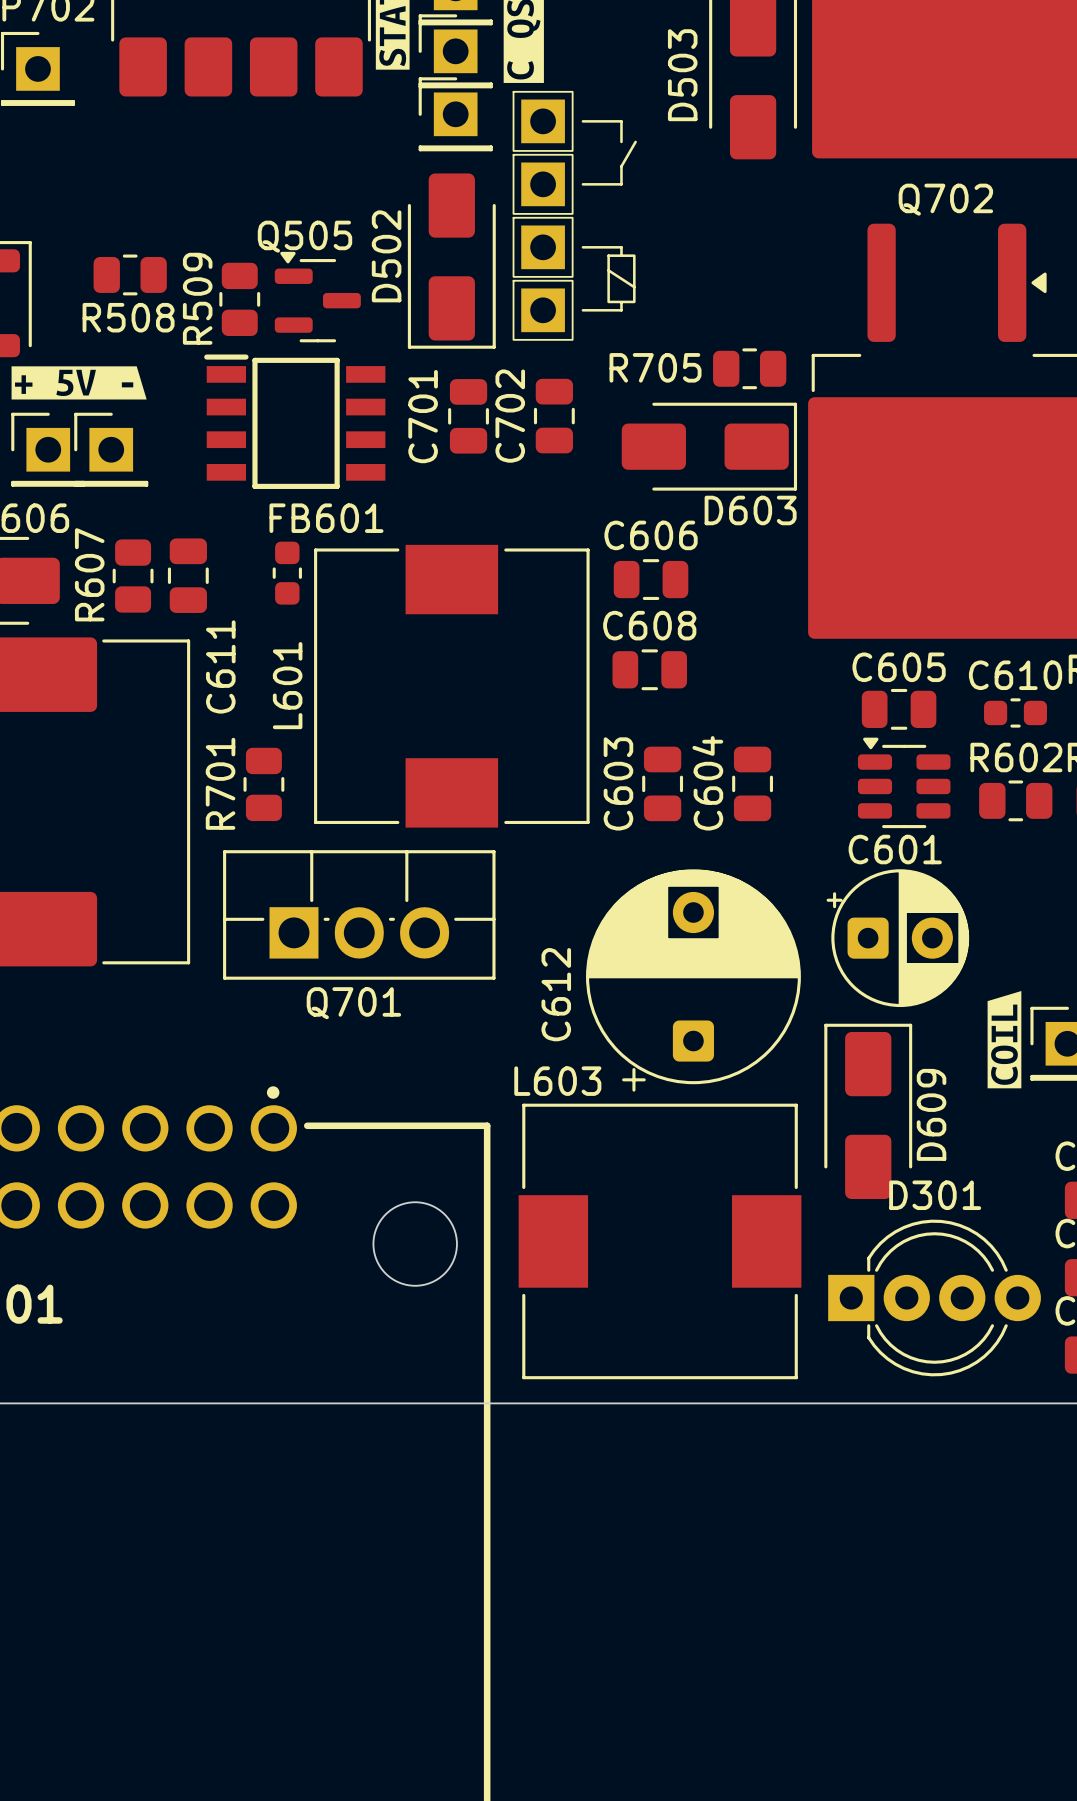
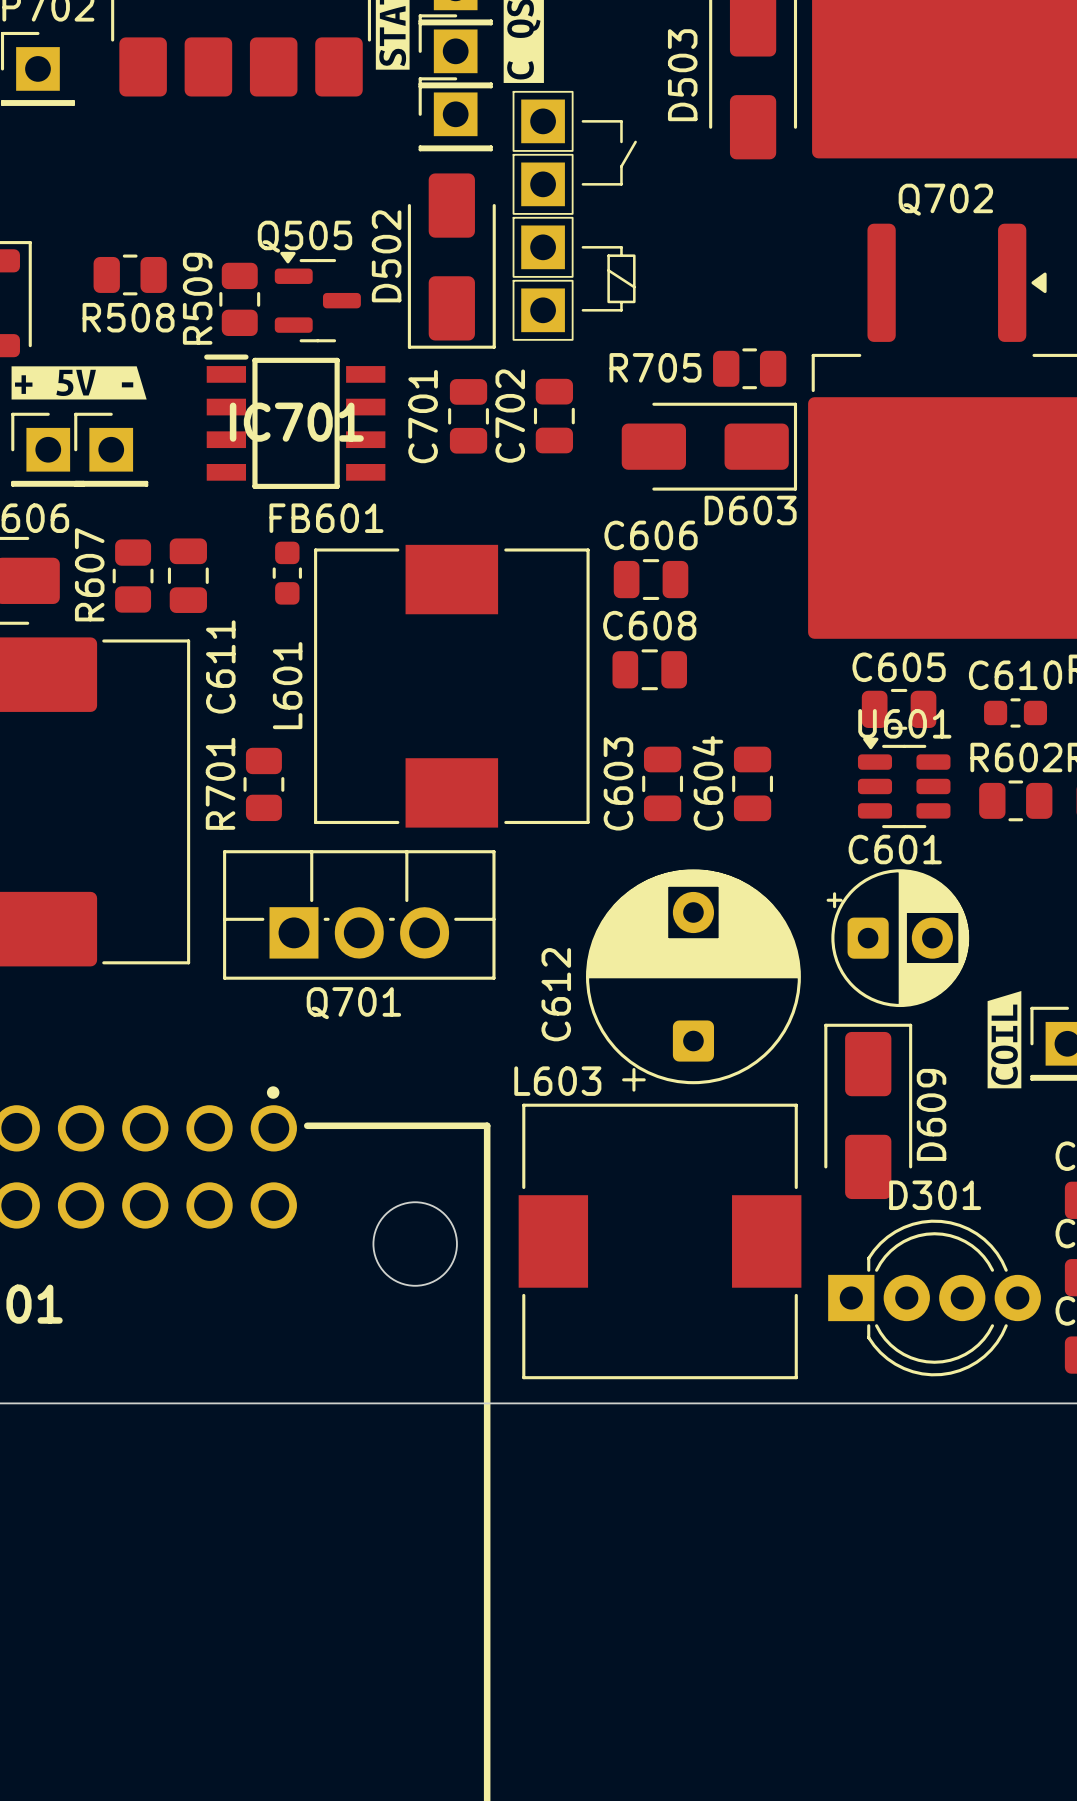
IC701 name: none -> IC701 (296, 422)
U601 name: none -> U601 (904, 723)

